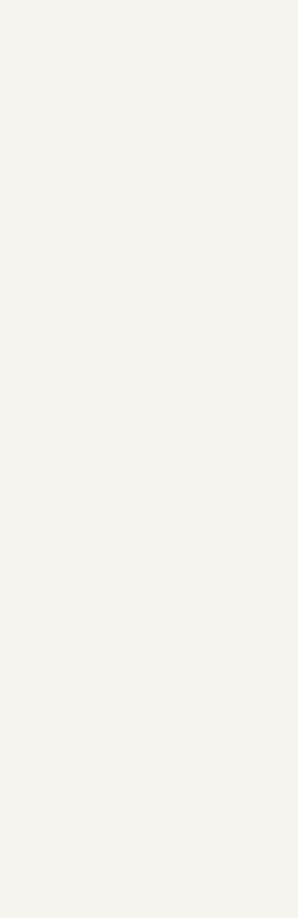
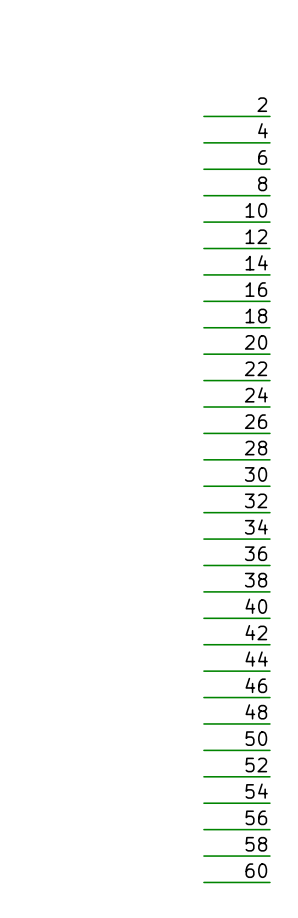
label: none -> 2 (262, 104)
wire: none -> (203, 116) (269, 116)
label: none -> 4 (262, 130)
wire: none -> (203, 142) (269, 142)
label: none -> 6 (262, 157)
wire: none -> (203, 169) (269, 169)
label: none -> 8 (262, 183)
wire: none -> (203, 195) (269, 195)
label: none -> 10 (256, 210)
wire: none -> (203, 222) (269, 222)
label: none -> 12 (256, 236)
wire: none -> (203, 248) (269, 248)
label: none -> 14 (256, 262)
wire: none -> (203, 274) (269, 274)
label: none -> 16 (256, 289)
wire: none -> (203, 301) (269, 301)
label: none -> 18 (256, 315)
wire: none -> (203, 327) (269, 327)
label: none -> 20 (256, 342)
wire: none -> (203, 354) (269, 354)
label: none -> 22 (256, 368)
wire: none -> (203, 380) (269, 380)
label: none -> 24 (256, 394)
wire: none -> (203, 407) (269, 407)
label: none -> 26 (256, 421)
wire: none -> (203, 433) (269, 433)
label: none -> 28 (256, 448)
wire: none -> (203, 459) (269, 459)
label: none -> 30 (256, 474)
wire: none -> (203, 486) (269, 486)
label: none -> 32 (256, 500)
wire: none -> (203, 512) (269, 512)
label: none -> 34 (256, 526)
wire: none -> (203, 539) (269, 539)
label: none -> 36 (256, 553)
wire: none -> (203, 565) (269, 565)
label: none -> 38 (256, 580)
wire: none -> (203, 591) (269, 591)
label: none -> 40 (256, 606)
wire: none -> (203, 618) (269, 618)
label: none -> 42 (256, 632)
wire: none -> (203, 644) (269, 644)
label: none -> 44 (256, 659)
wire: none -> (203, 671) (269, 671)
label: none -> 46 (256, 685)
wire: none -> (203, 697) (269, 697)
label: none -> 48 (256, 711)
wire: none -> (203, 723) (269, 723)
label: none -> 50 (256, 738)
wire: none -> (203, 750) (269, 750)
label: none -> 52 (256, 765)
wire: none -> (203, 776) (269, 776)
label: none -> 54 (256, 791)
wire: none -> (203, 803) (269, 803)
label: none -> 56 (256, 817)
wire: none -> (203, 829) (269, 829)
label: none -> 58 (256, 844)
wire: none -> (203, 856) (269, 856)
label: none -> 60 (256, 870)
wire: none -> (203, 882) (269, 882)

